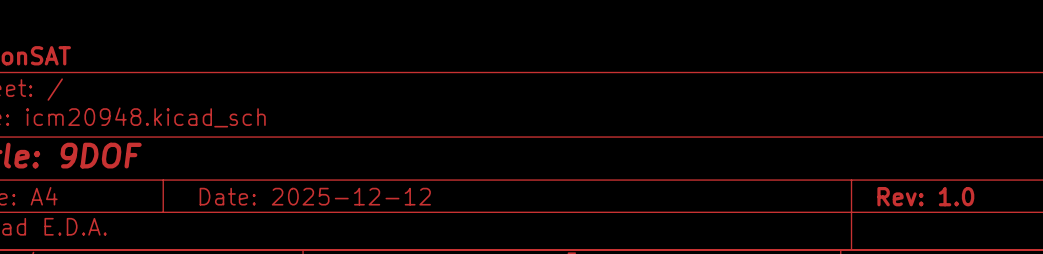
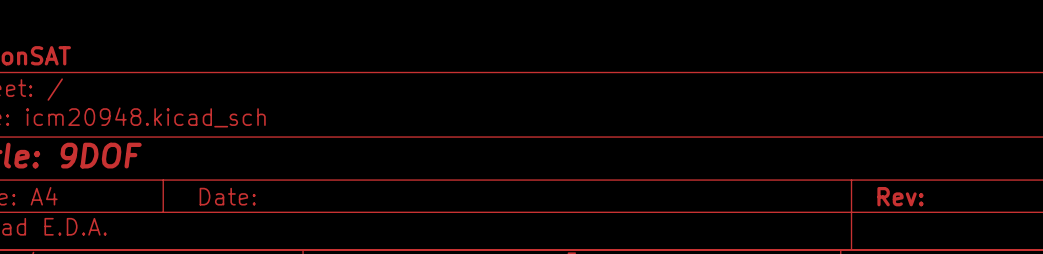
title block: Date: 2025-12-12 (315, 196) -> Date: (227, 196)
title block: Rev: 1.0 (925, 196) -> Rev: (900, 196)

